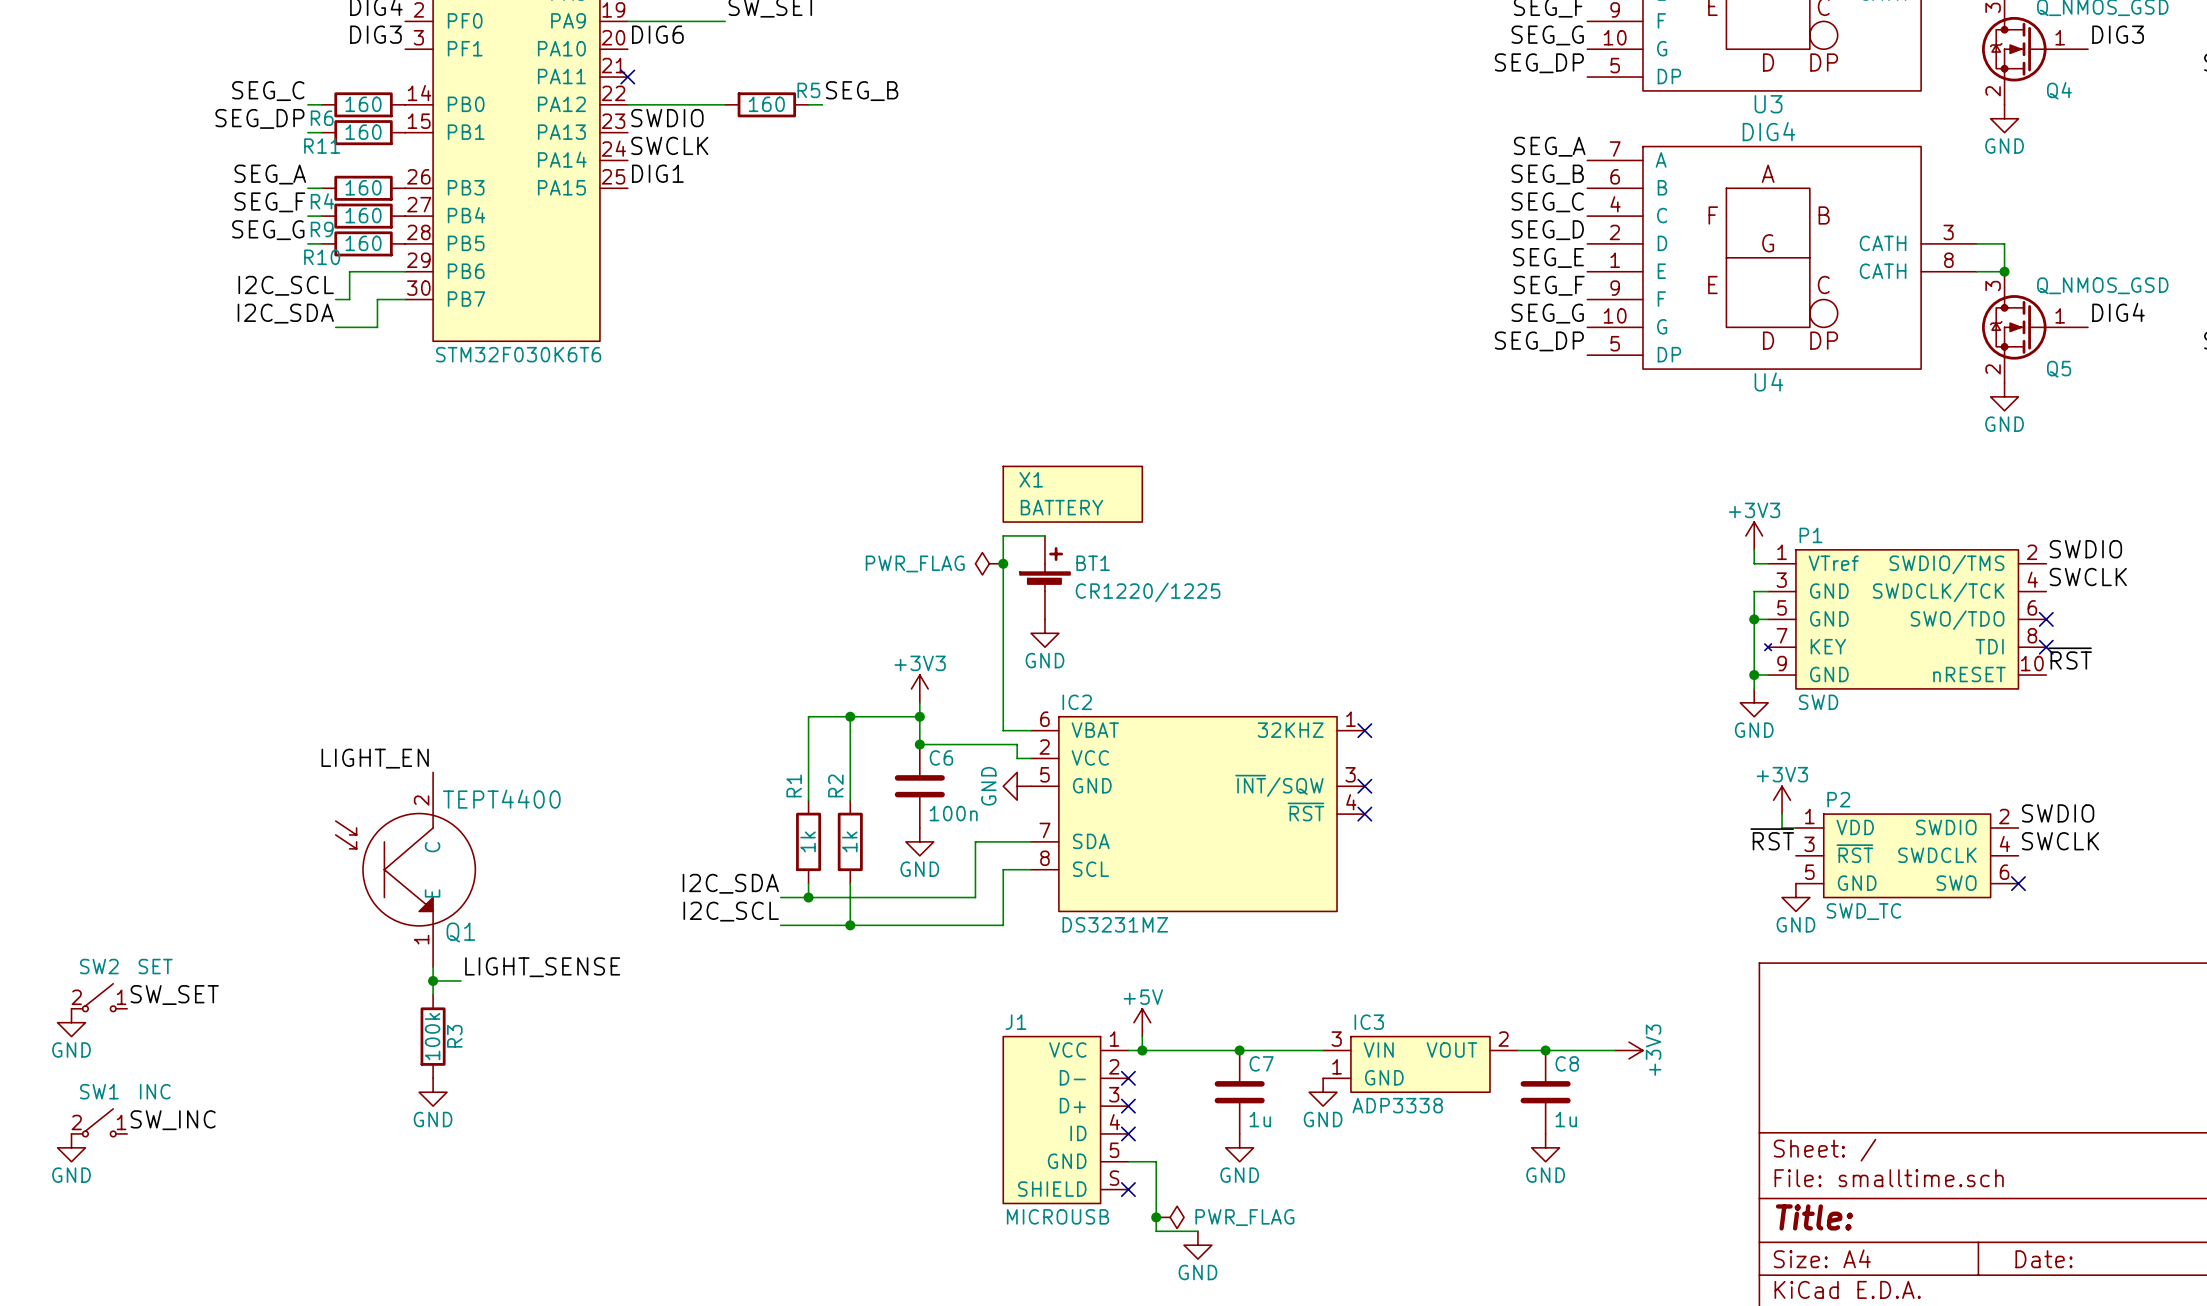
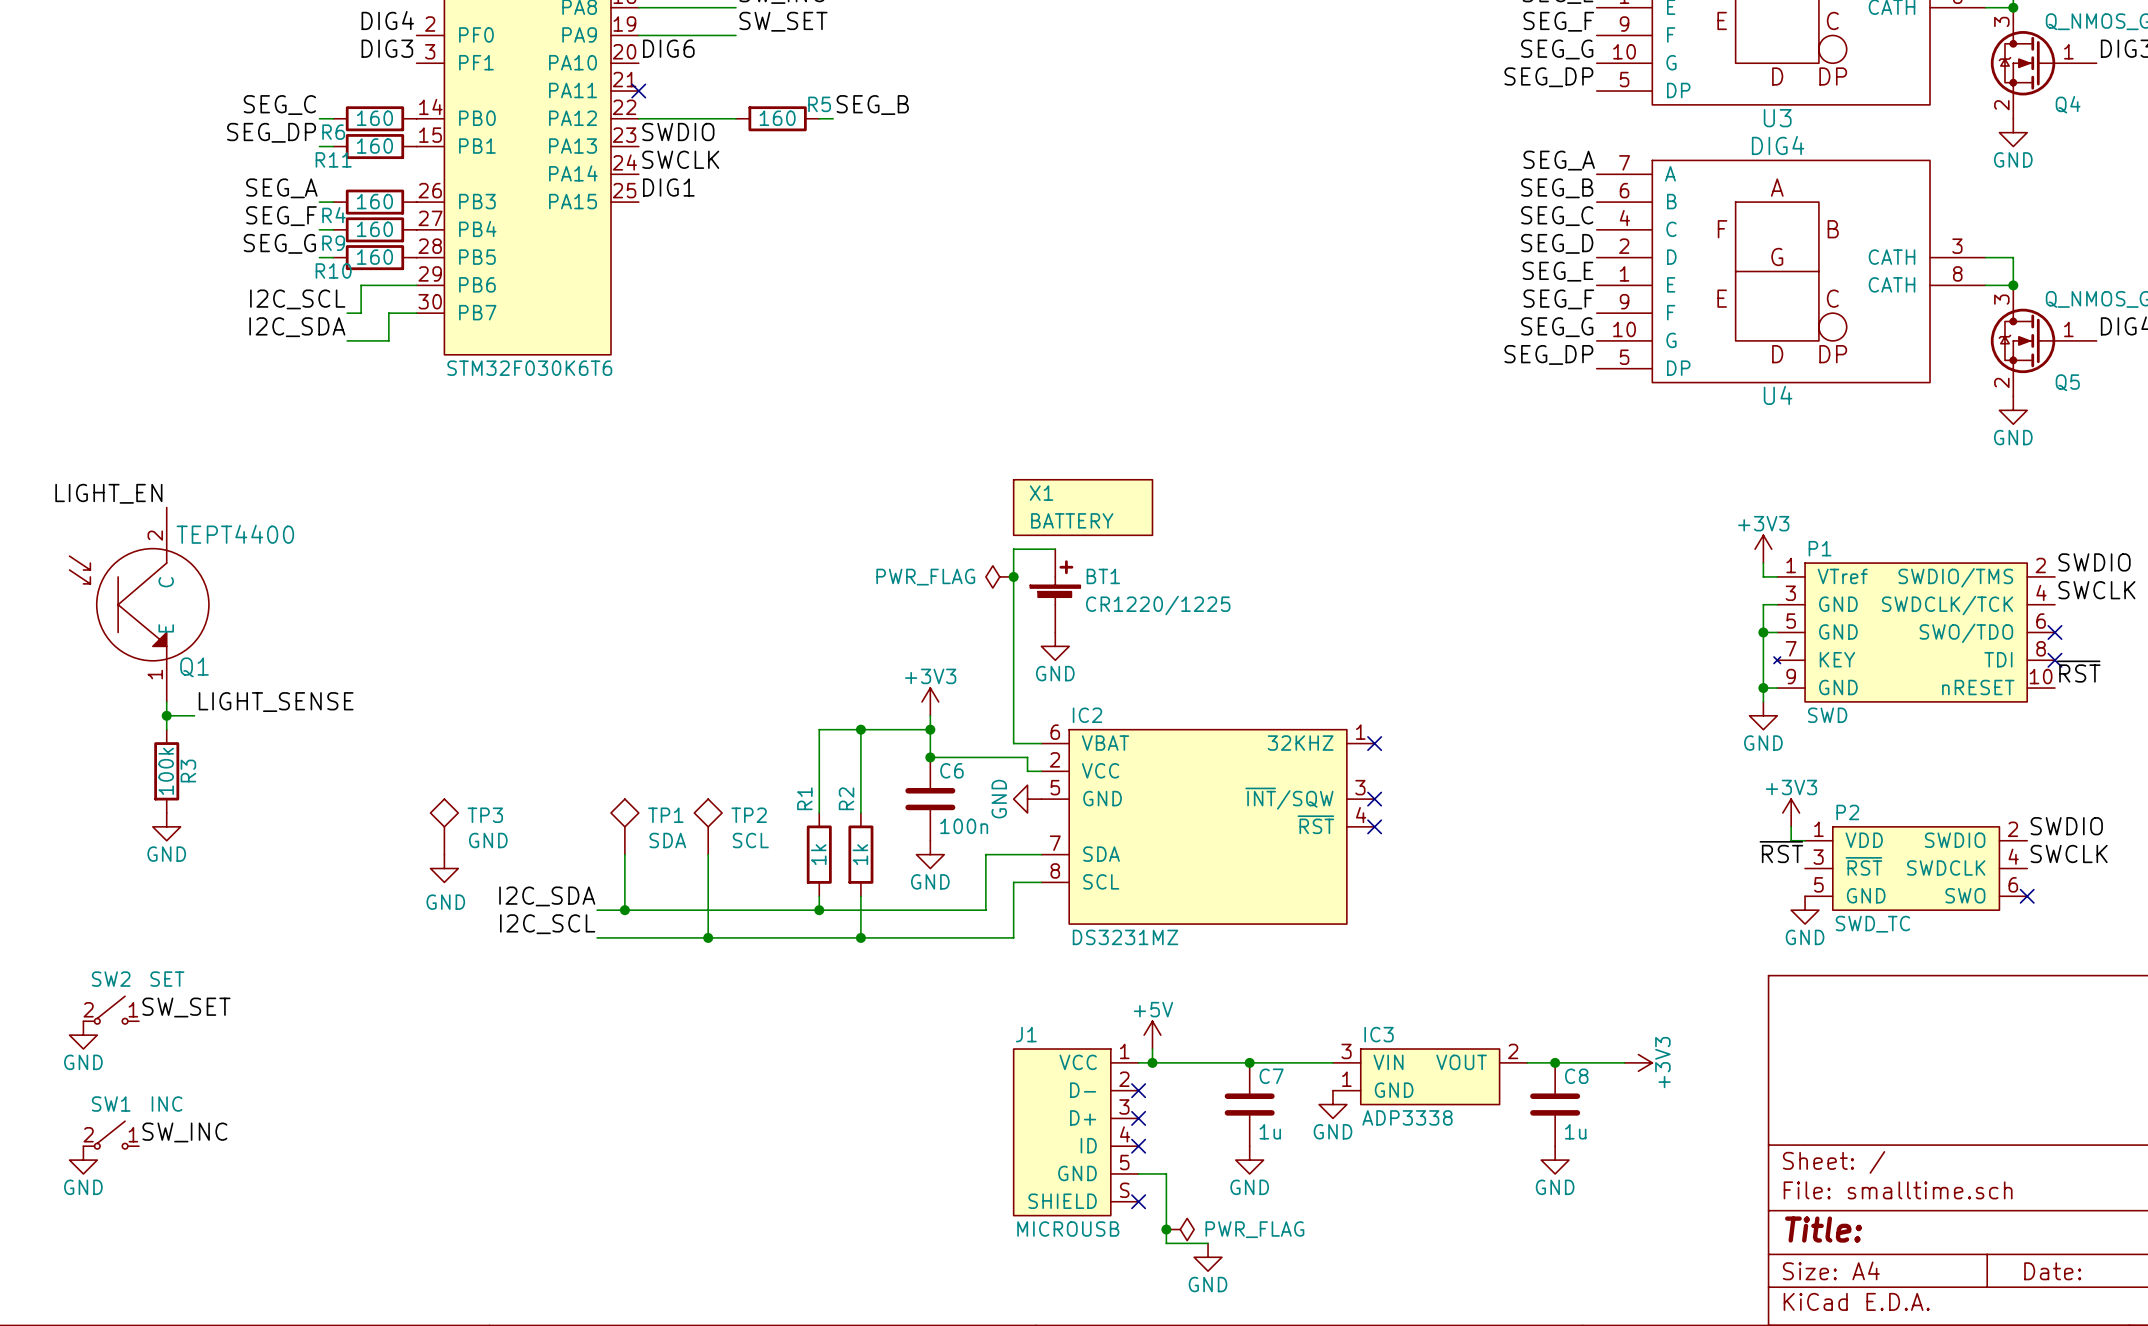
label: none -> LIGHT_EN (108, 493)
wire: none -> (166, 701) (166, 729)
label: none -> LIGHT_SENSE (276, 702)
wire: none -> (166, 715) (194, 715)
junction: none -> (166, 715)
label: LIGHT_EN (375, 758) -> none
power symbol: none -> GND (166, 826)
TP3: none -> GND (444, 826)
TP1: none -> SDA (624, 826)
TP2: none -> SCL (708, 826)
wire: none -> (624, 854) (624, 910)
wire: none -> (708, 854) (708, 937)
power symbol: none -> GND (444, 868)
Q1 position: (405, 869) -> (139, 604)
label position: I2C_SDA (730, 883) -> I2C_SDA (547, 896)
wire: none -> (597, 910) (791, 910)
junction: none -> (624, 910)
label position: I2C_SCL (731, 911) -> I2C_SCL (547, 924)
wire: none -> (597, 937) (791, 937)
junction: none -> (708, 937)
wire: (433, 967) (433, 994) -> none
label: LIGHT_SENSE (542, 967) -> none
wire: (433, 980) (460, 980) -> none
junction: (433, 980) -> none
R3 position: (433, 1036) -> (166, 771)
power symbol: GND (433, 1092) -> none

